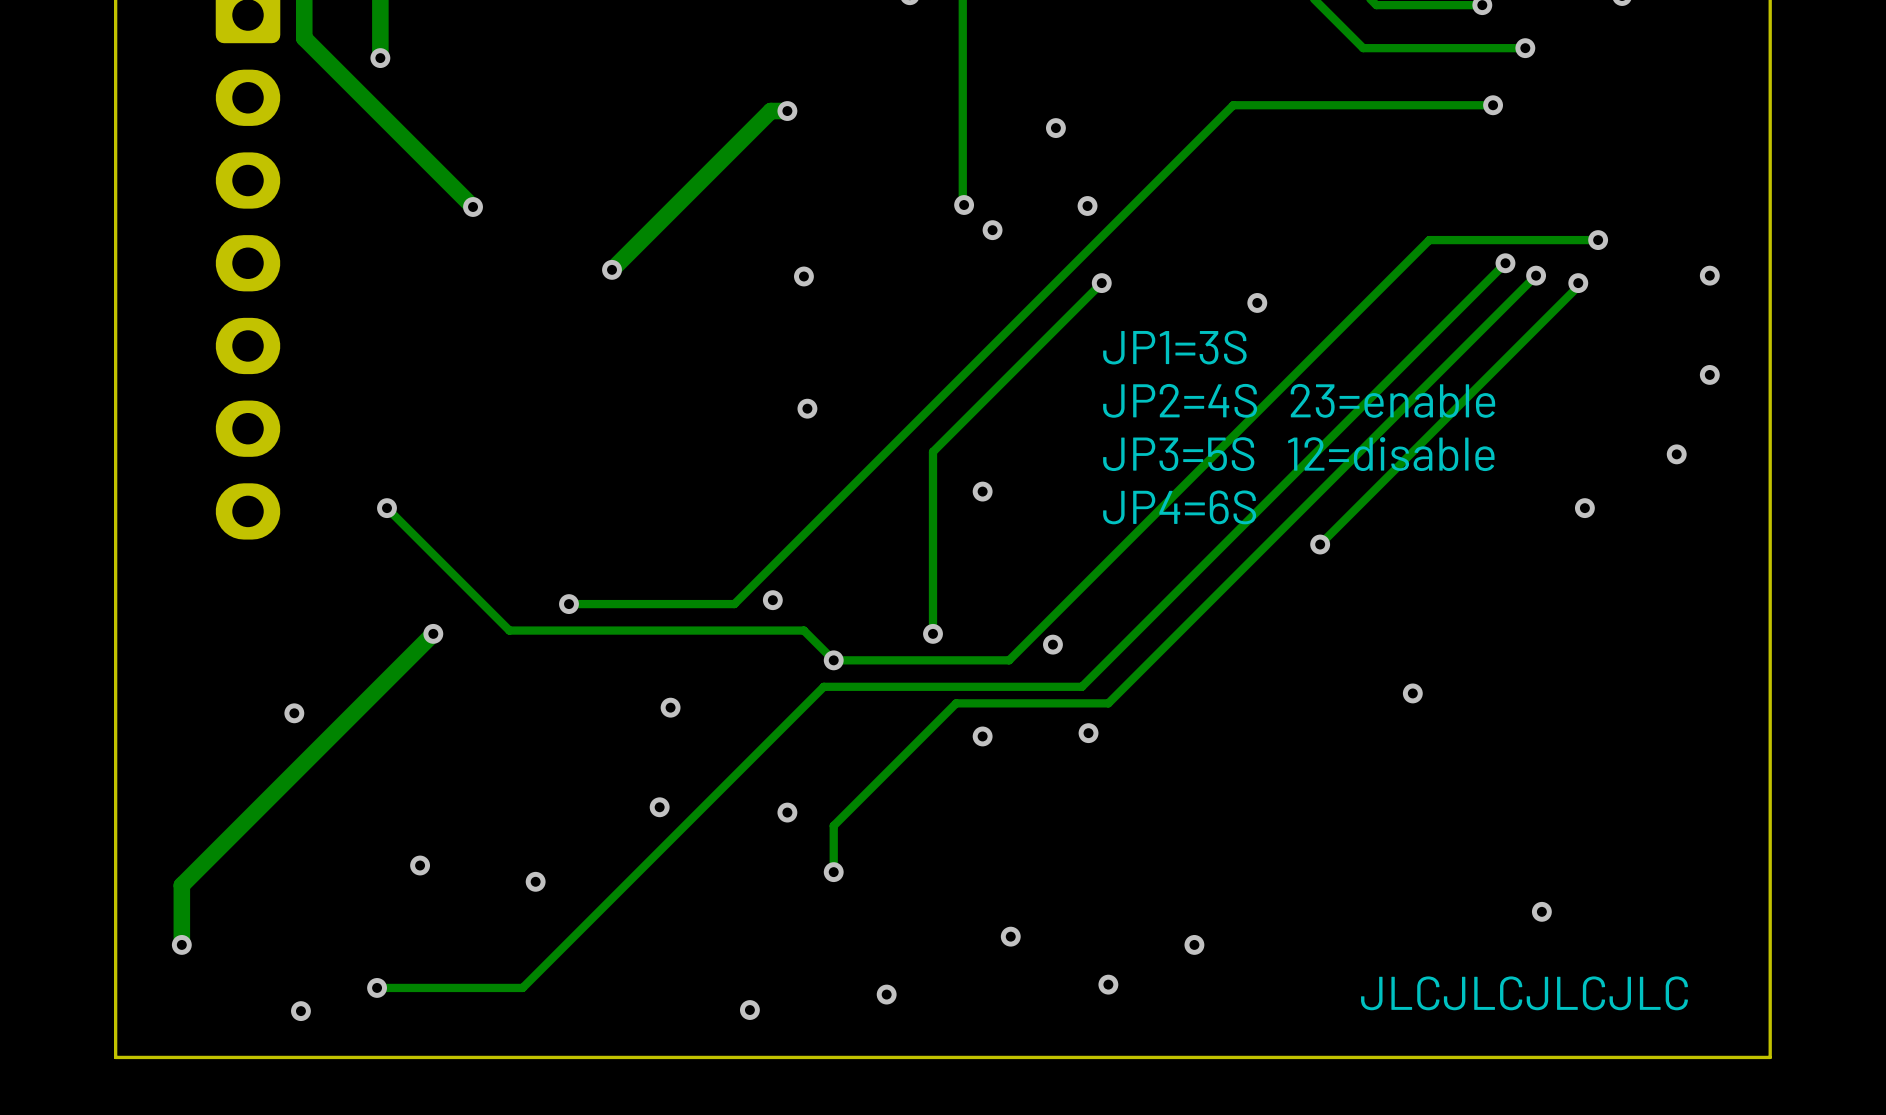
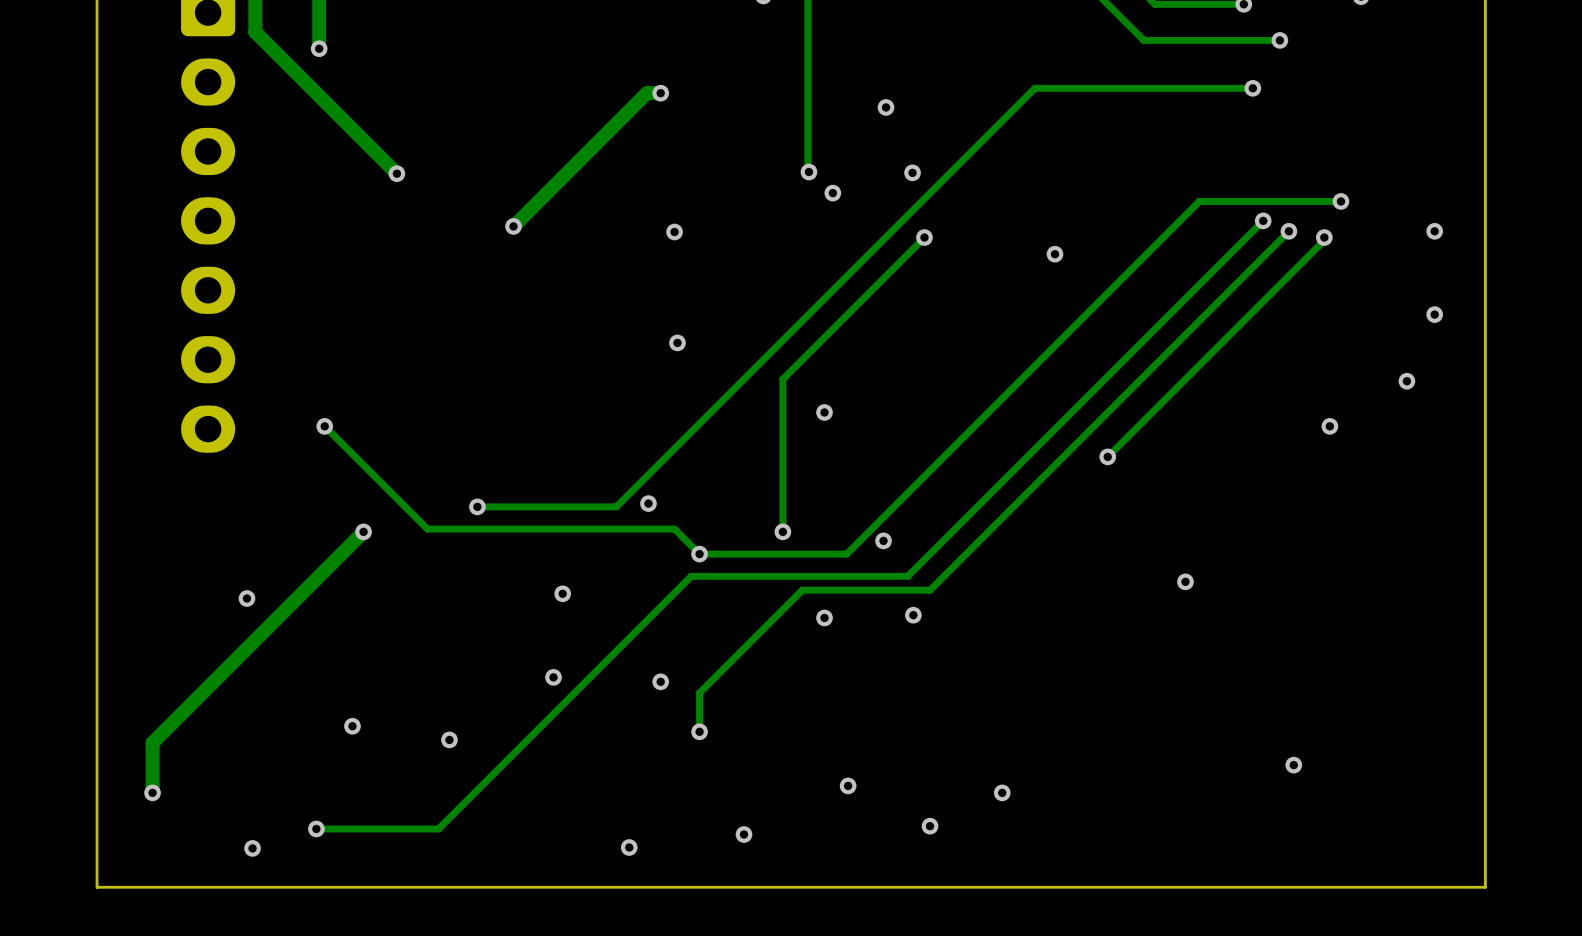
text: JP1=3S (1174, 347) -> none
text: JP2=4S 23=enable (1299, 400) -> none
text: JP3=5S 12=disable (1298, 454) -> none
text: JP4=6S (1179, 507) -> none
text: JLCJLCJLCJLC (1524, 993) -> none

